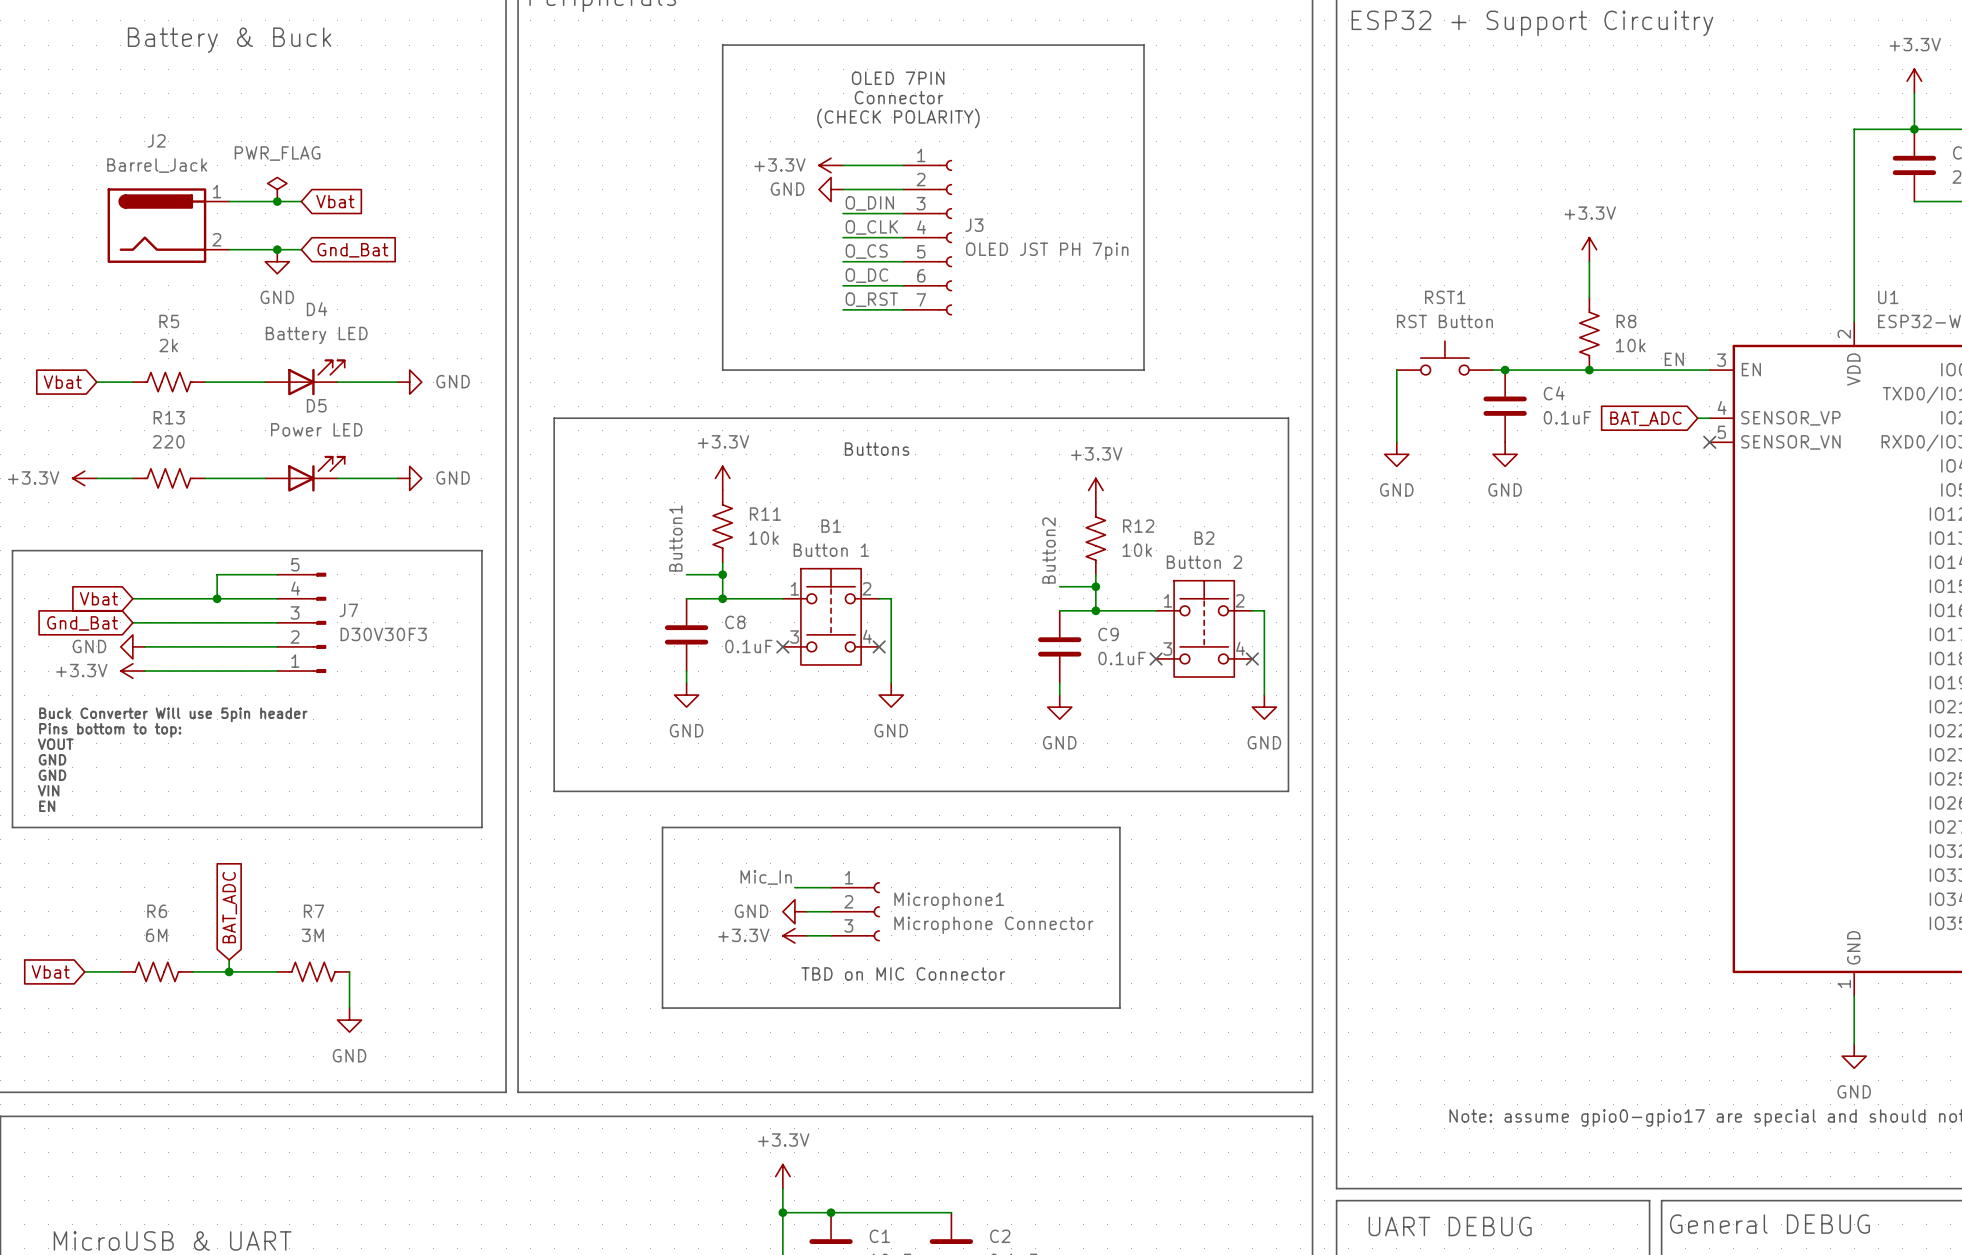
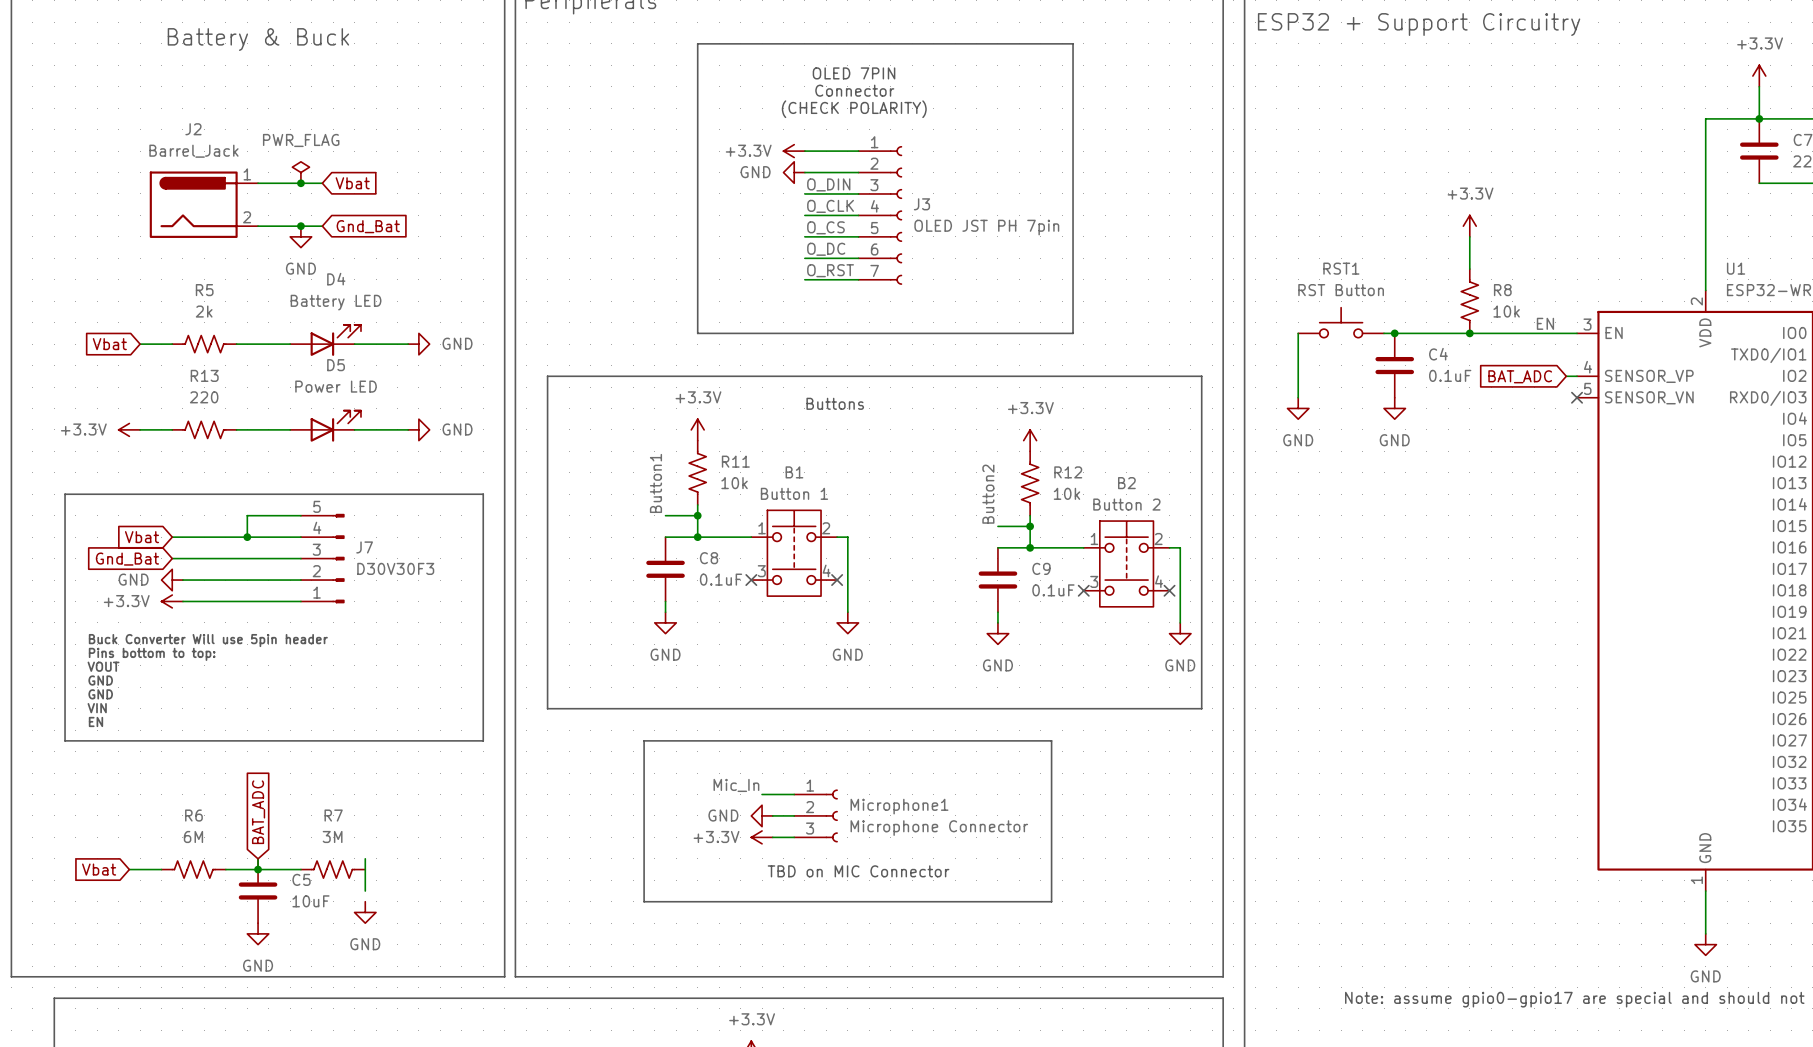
C5: none -> 10uF (258, 891)
wire: (349, 996) (349, 1008) -> (365, 858) (365, 869)
power symbol: none -> GND (258, 933)

